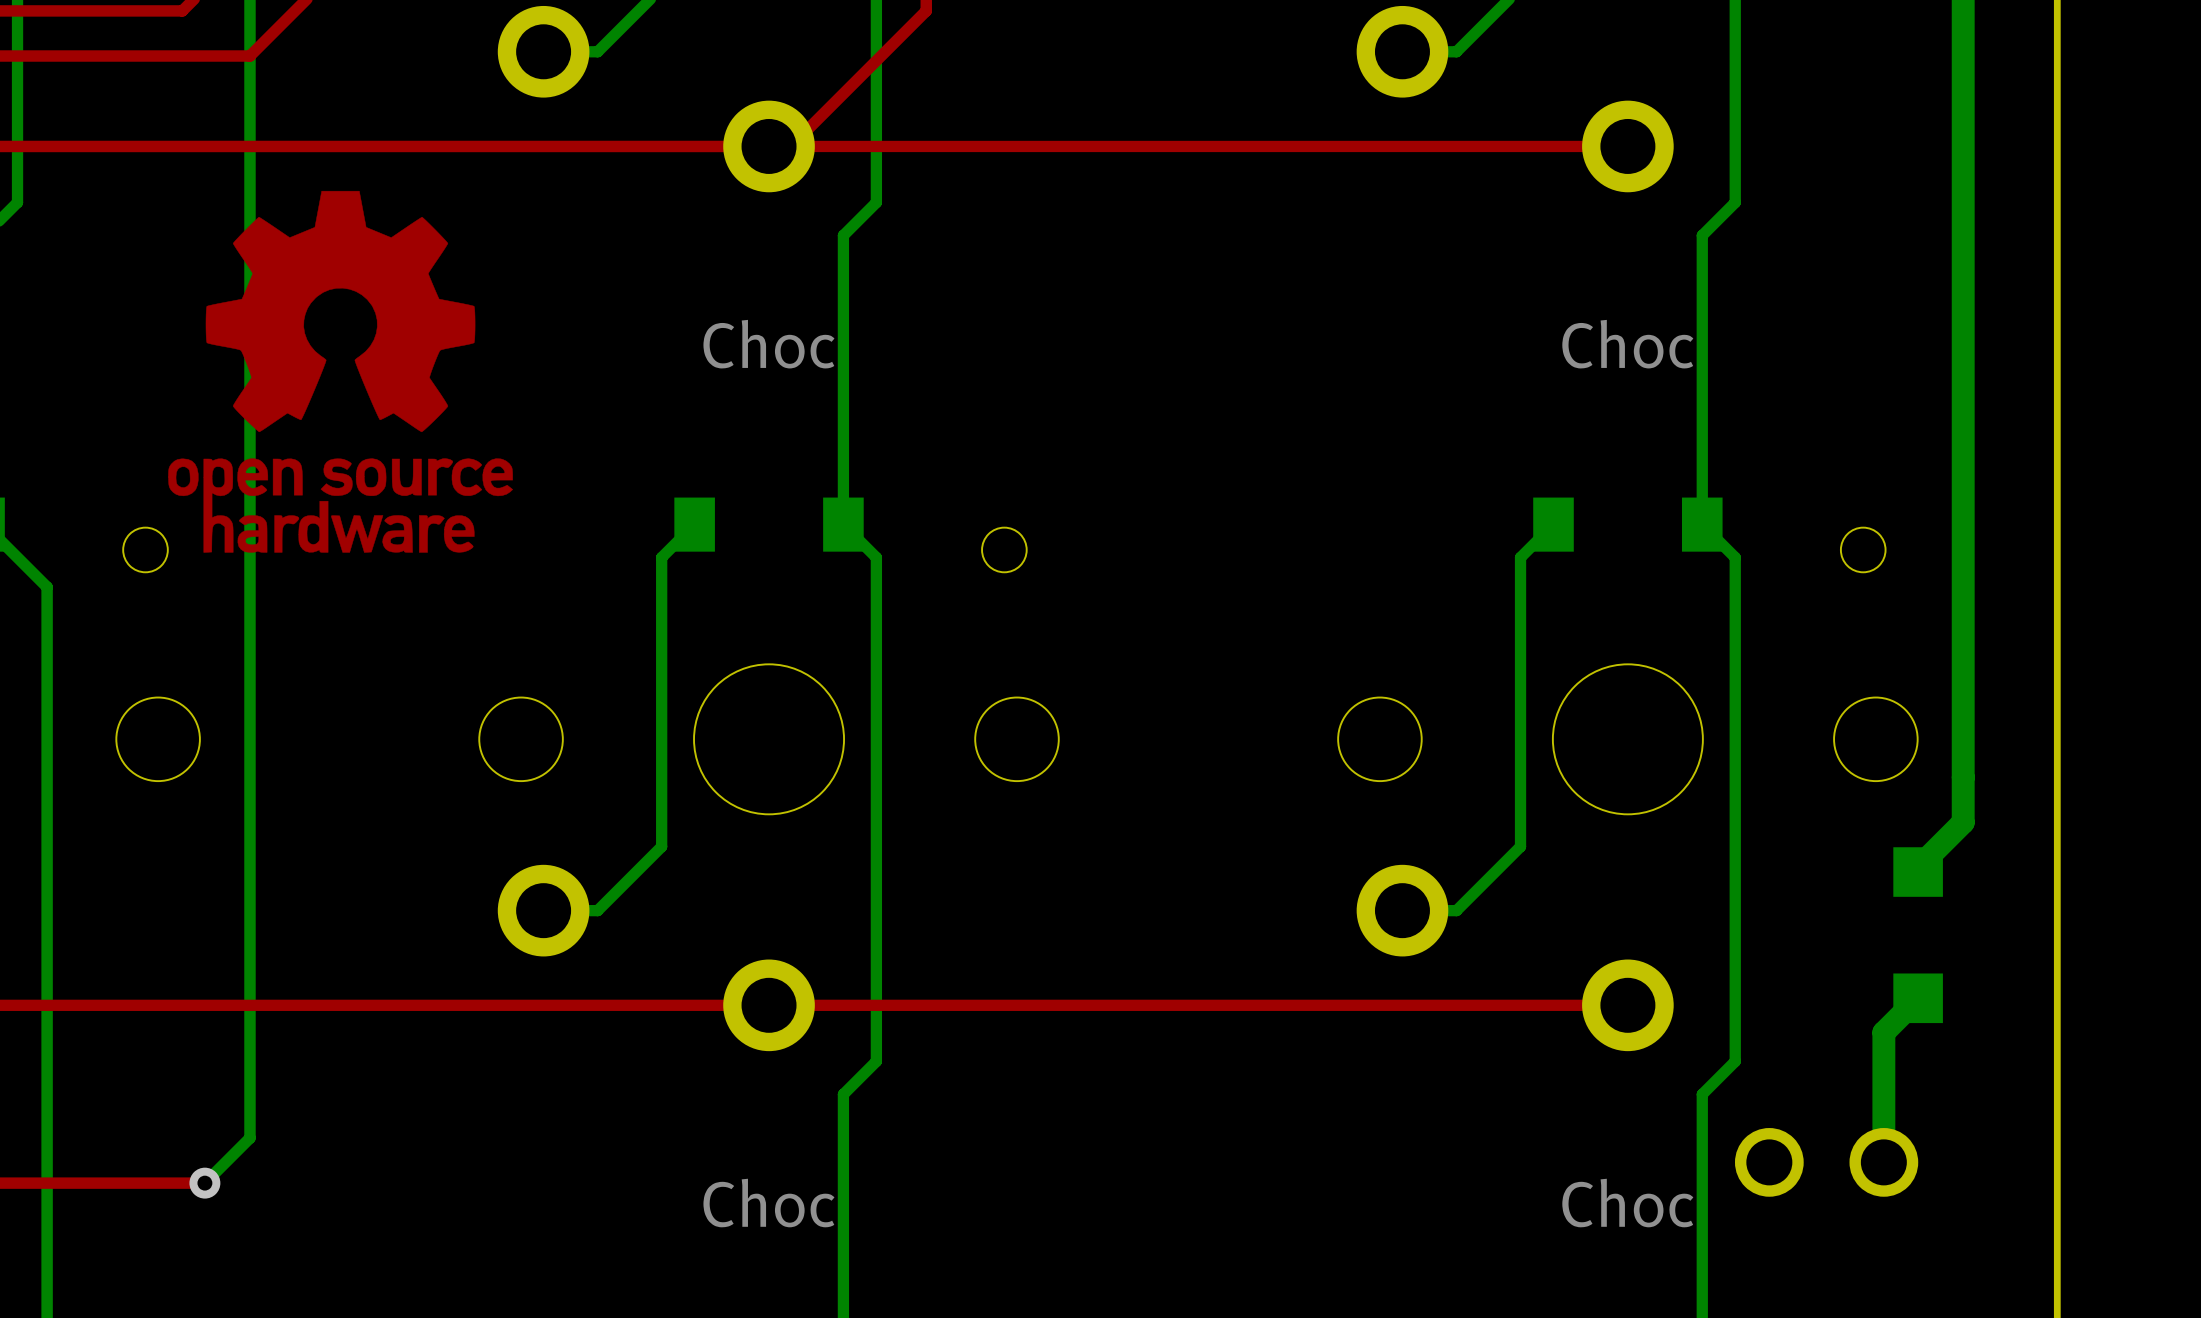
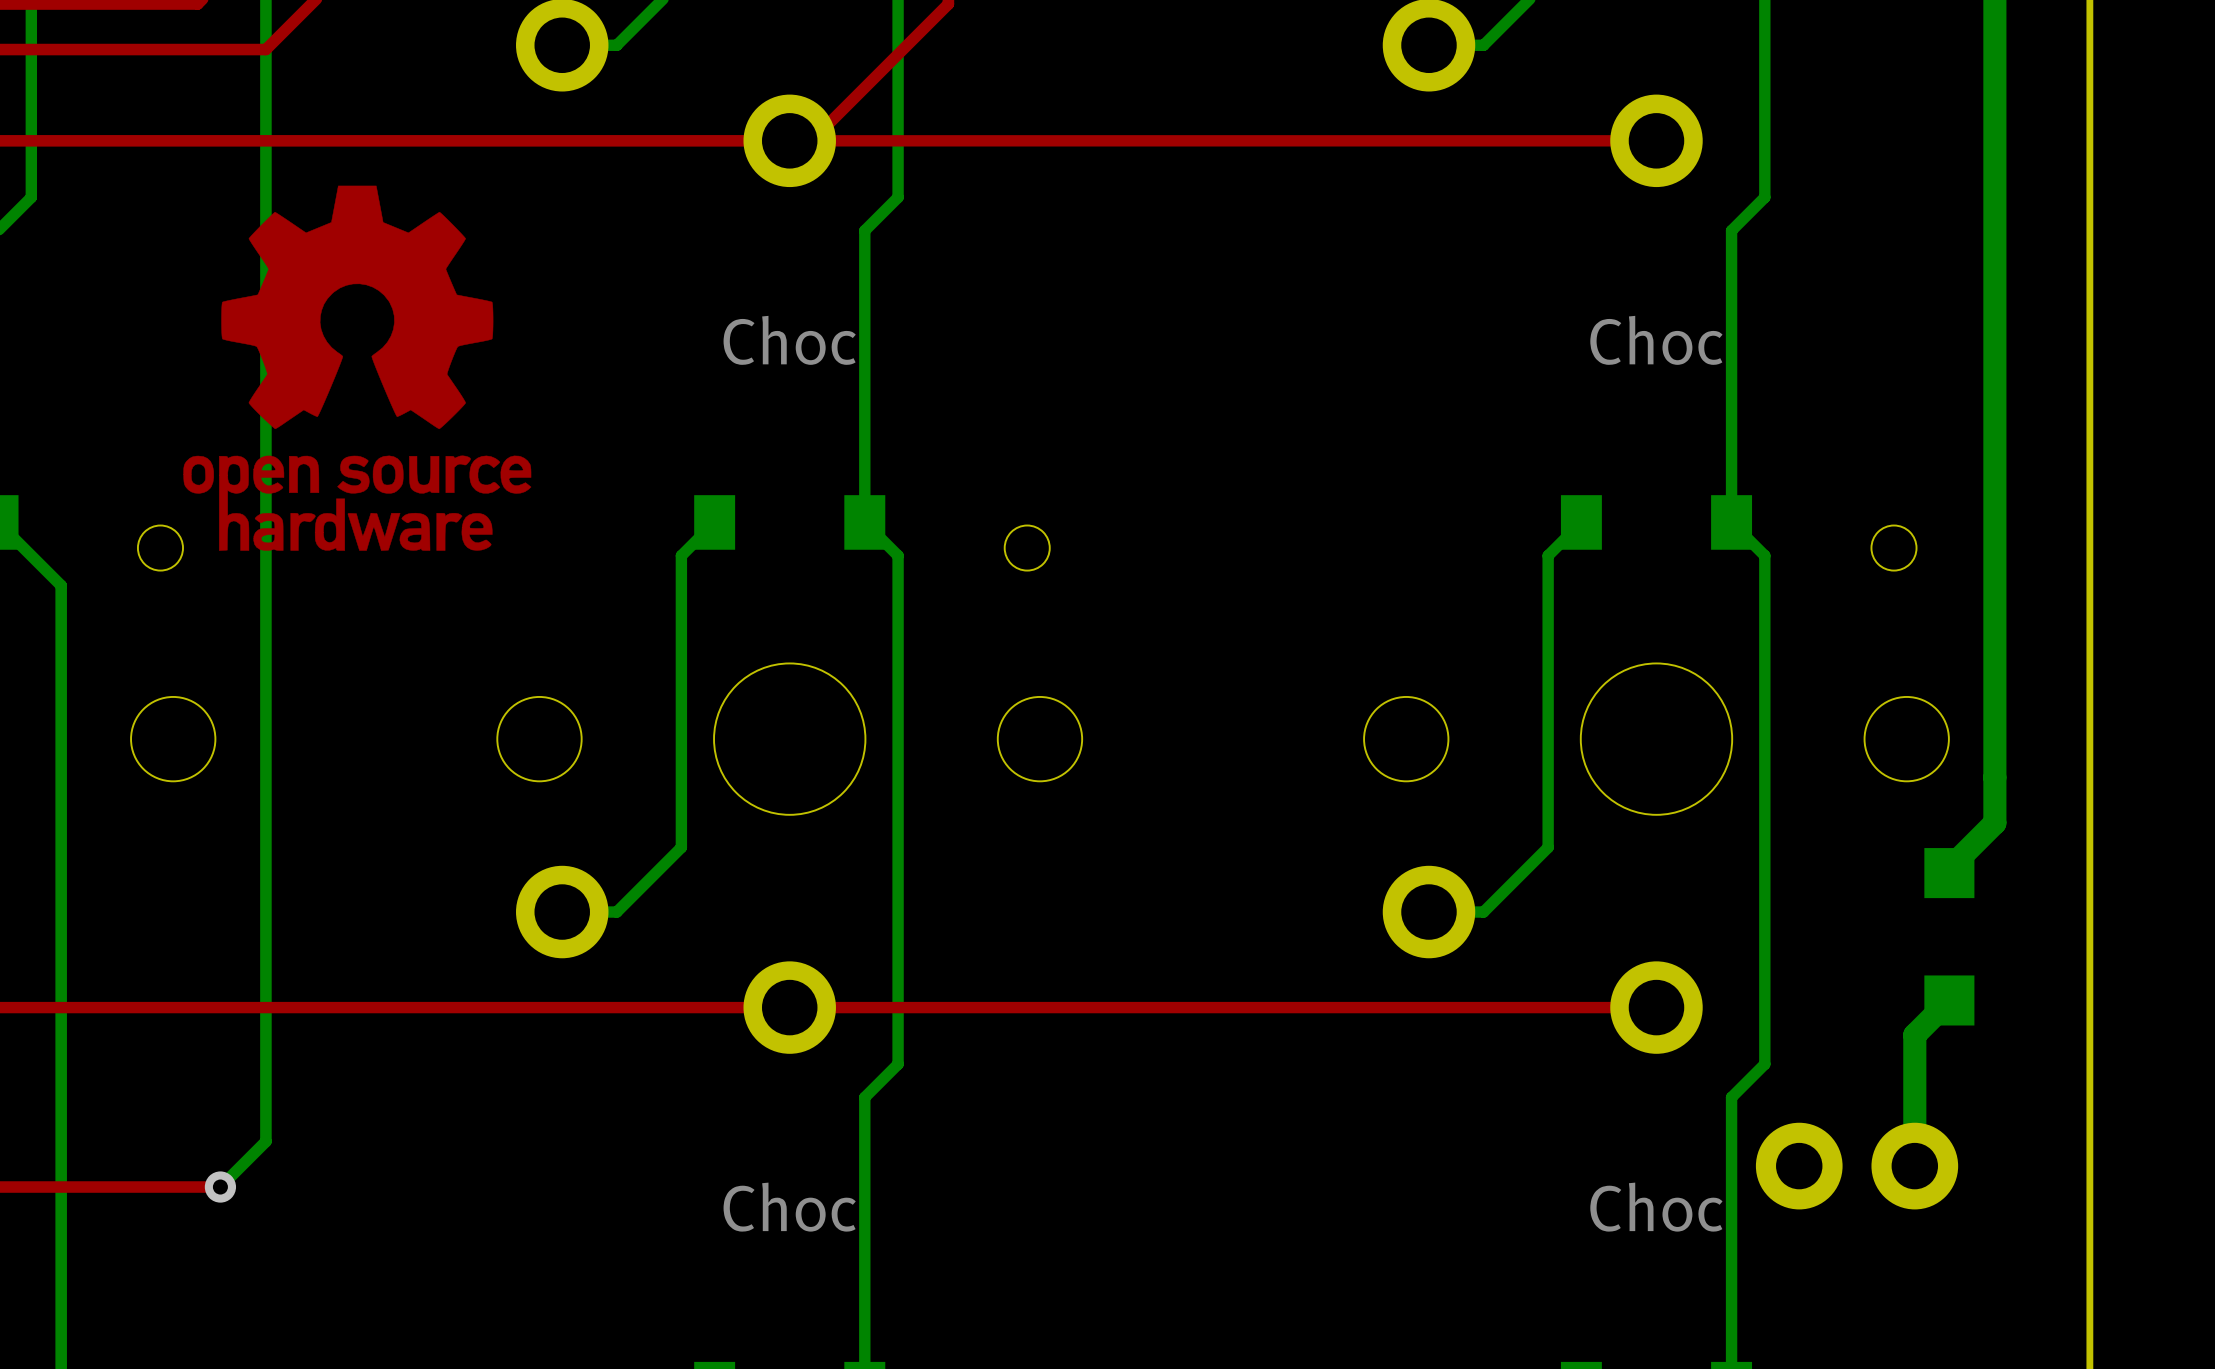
part footprint: [1734, 1128, 1919, 1197] -> [1755, 1122, 1959, 1210]

